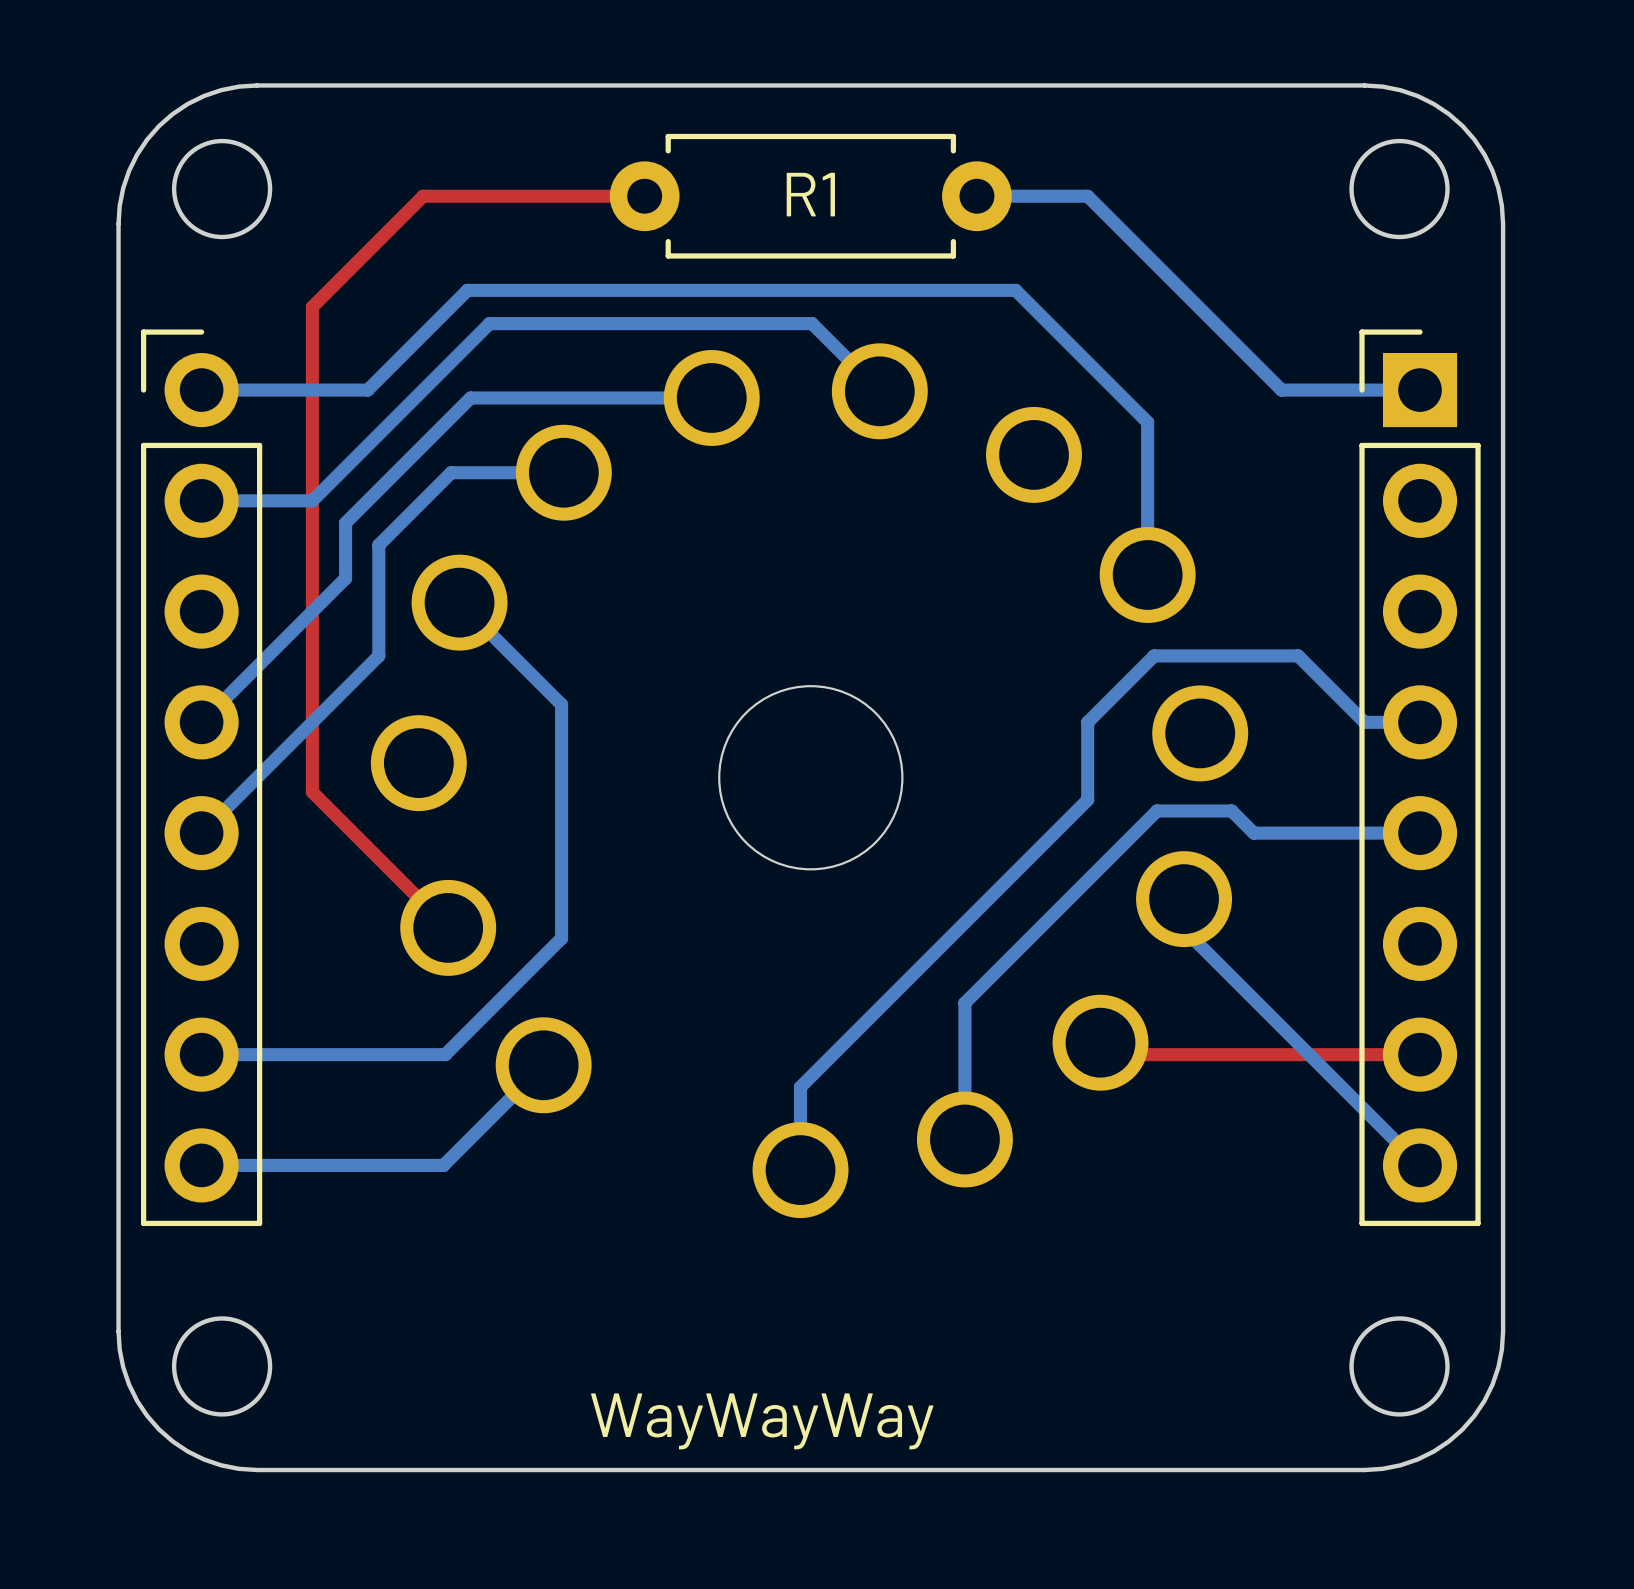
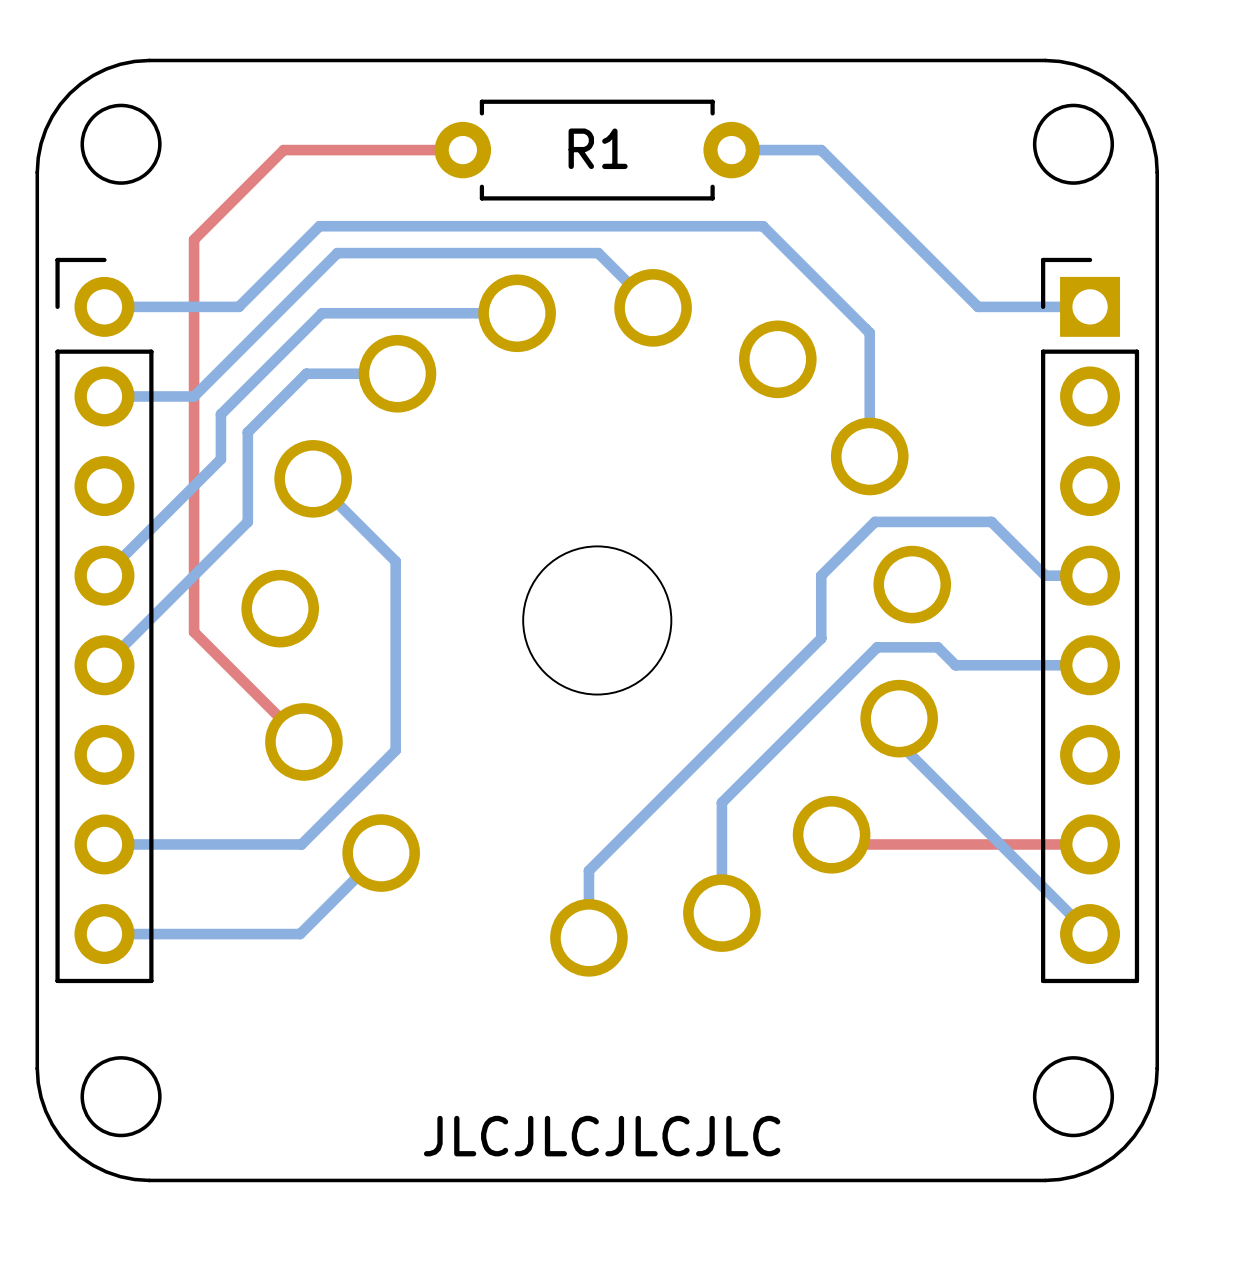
text: WayWayWay (762, 1421) -> JLCJLCJLCJLC (602, 1136)

